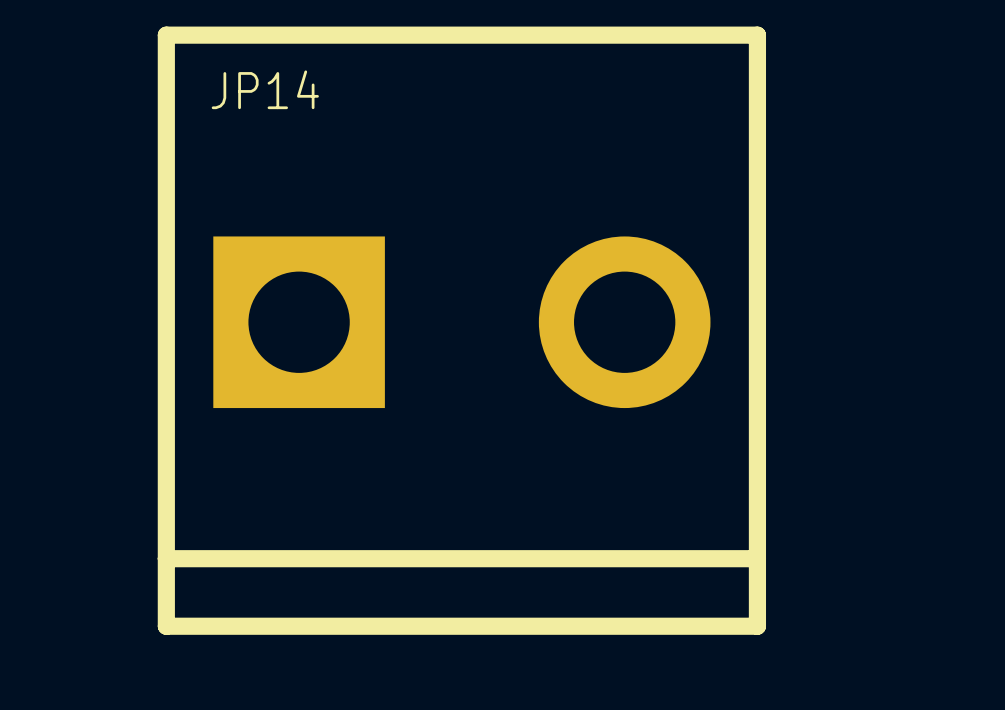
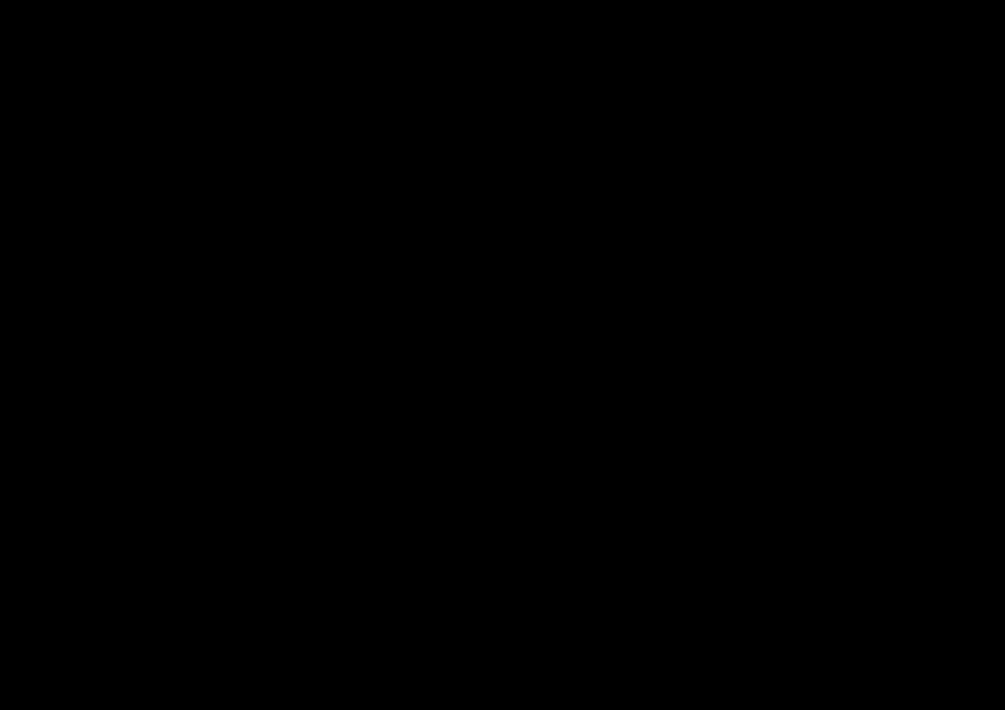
JP14: (461, 330) -> none

